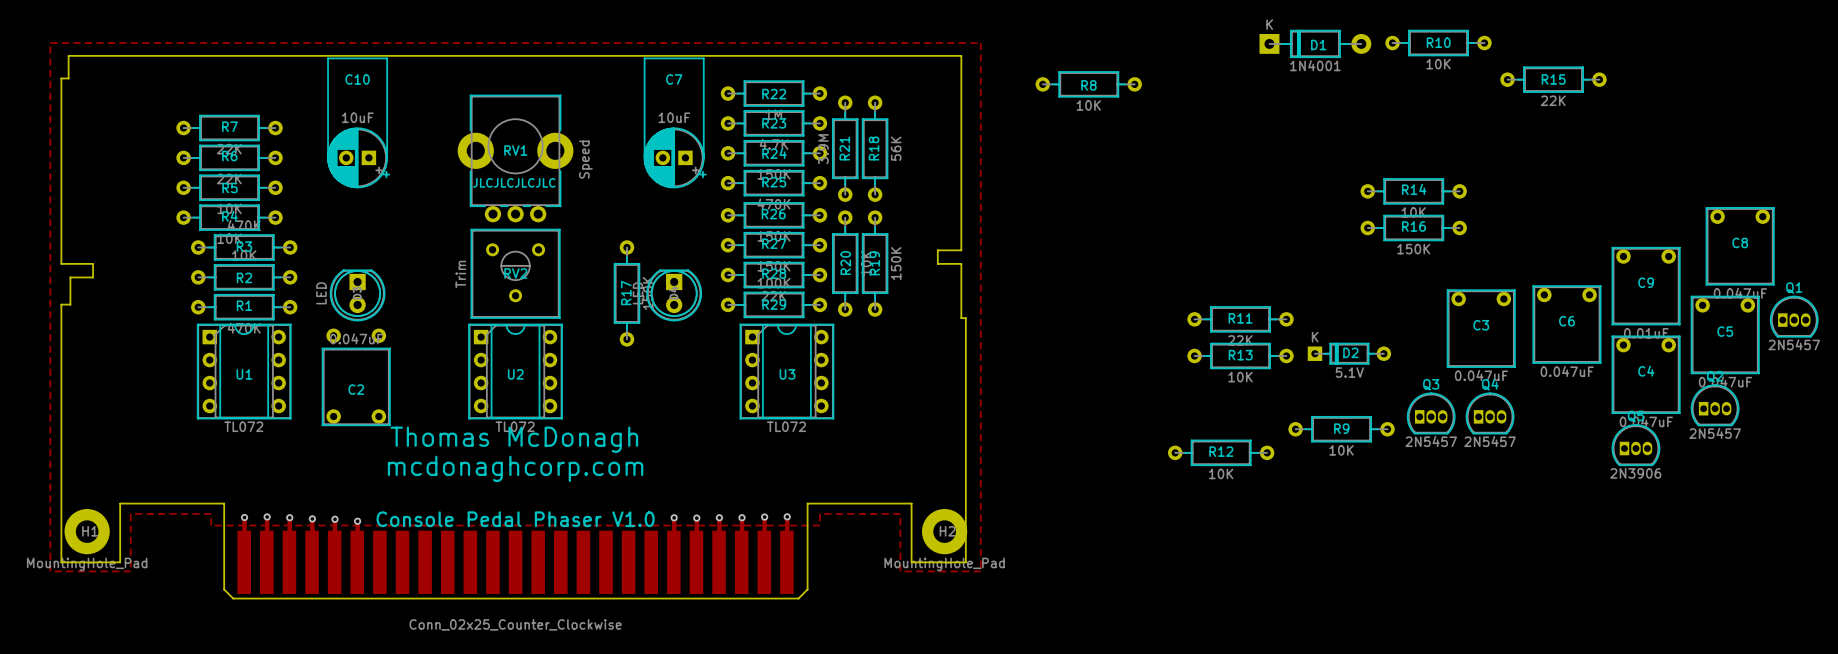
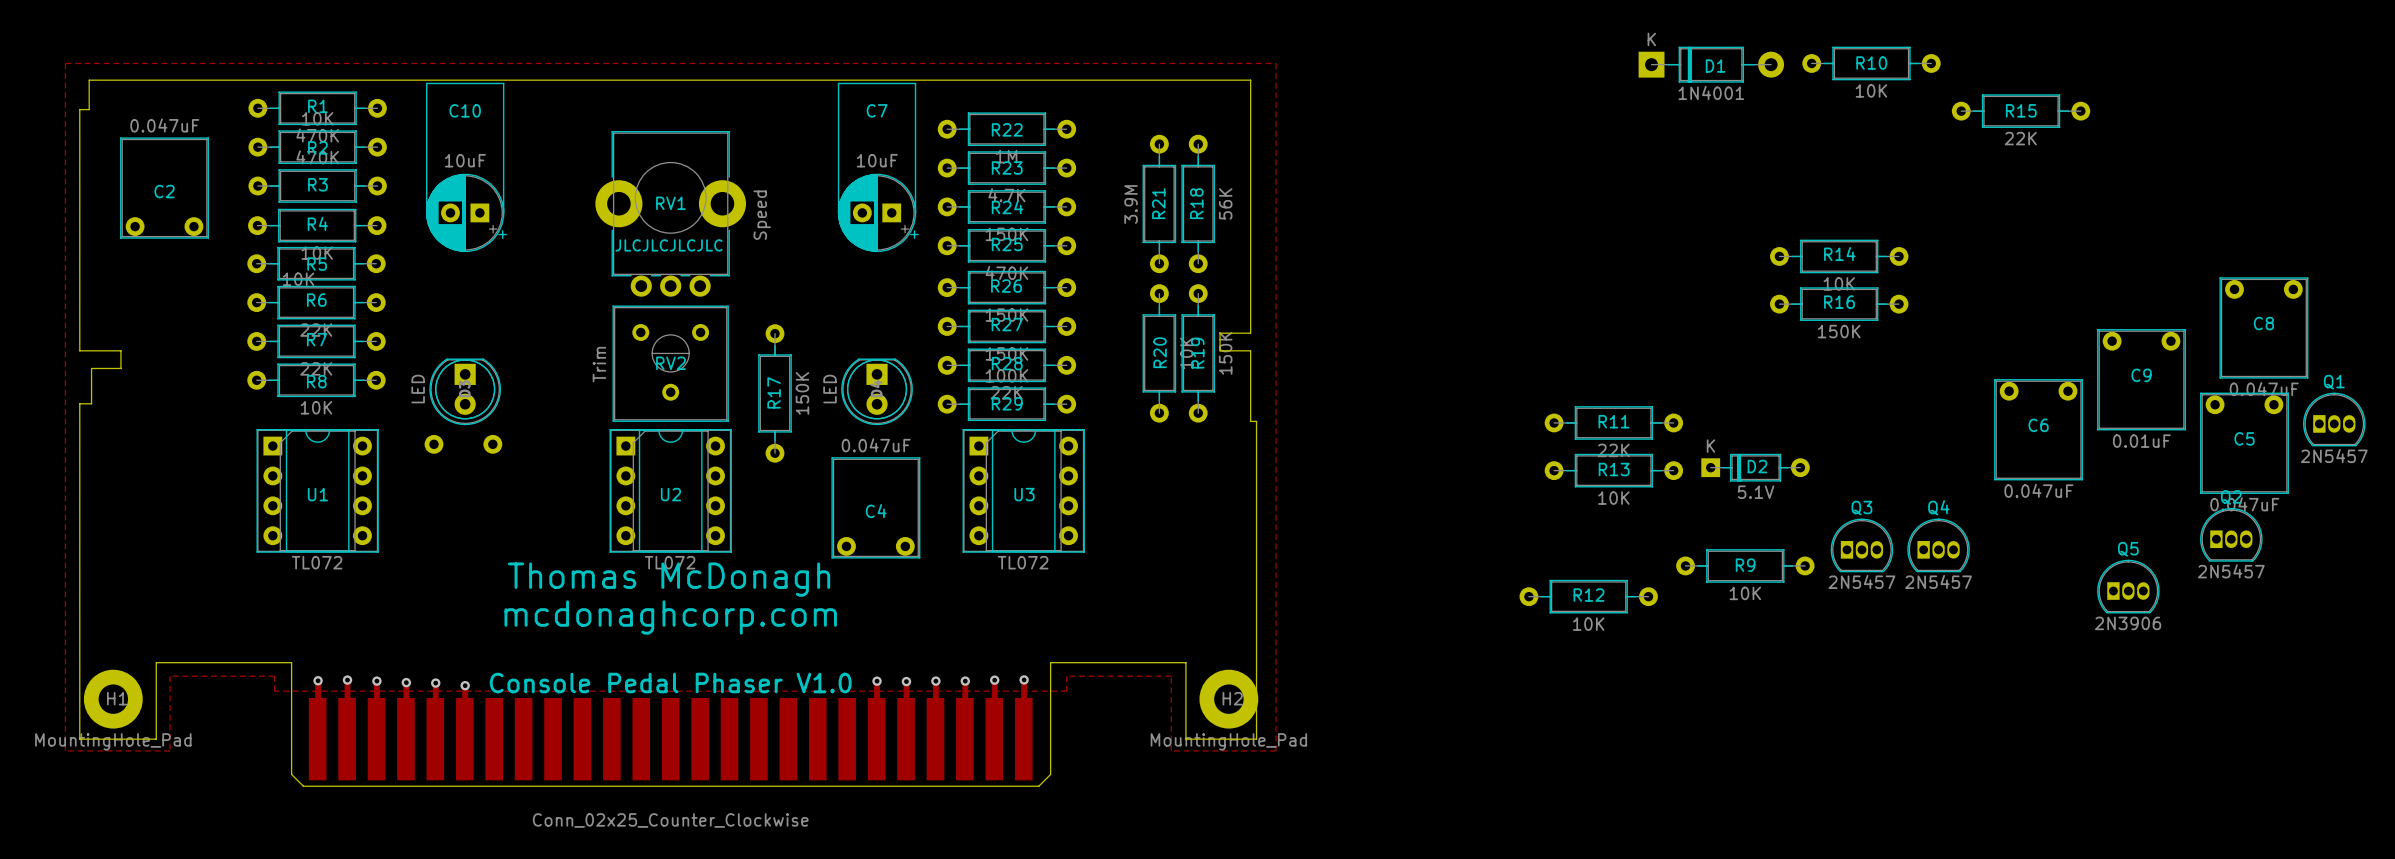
R8 position: (1088, 84) -> (316, 380)
R7 position: (229, 128) -> (316, 341)
R21 position: (845, 148) -> (1159, 203)
R18 position: (875, 148) -> (1198, 203)
R6 position: (229, 157) -> (316, 302)
R5 position: (229, 187) -> (316, 263)
R4 position: (229, 217) -> (317, 225)
R3 position: (244, 247) -> (317, 186)
R20 position: (845, 263) -> (1159, 353)
R19 position: (875, 263) -> (1198, 353)
R2 position: (244, 277) -> (317, 147)
R17 position: (626, 293) -> (775, 393)
R1 position: (244, 307) -> (317, 108)
C3: 0.047uF (1481, 328) -> none
C4 rotation: 0° (1646, 374) -> 180° (875, 507)
C4 position: (1646, 374) -> (875, 507)
C2 position: (356, 386) -> (164, 188)

